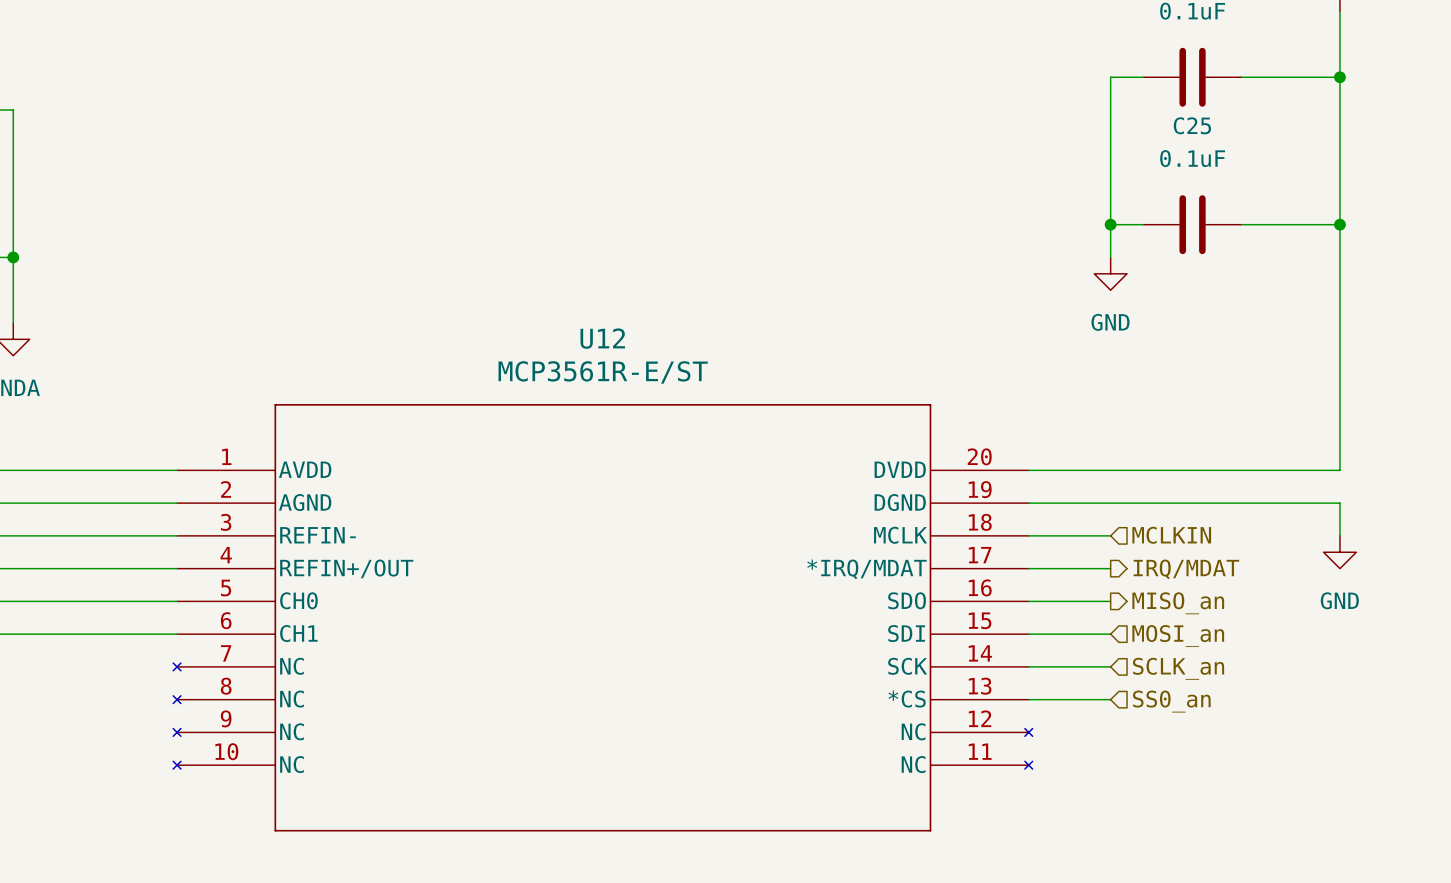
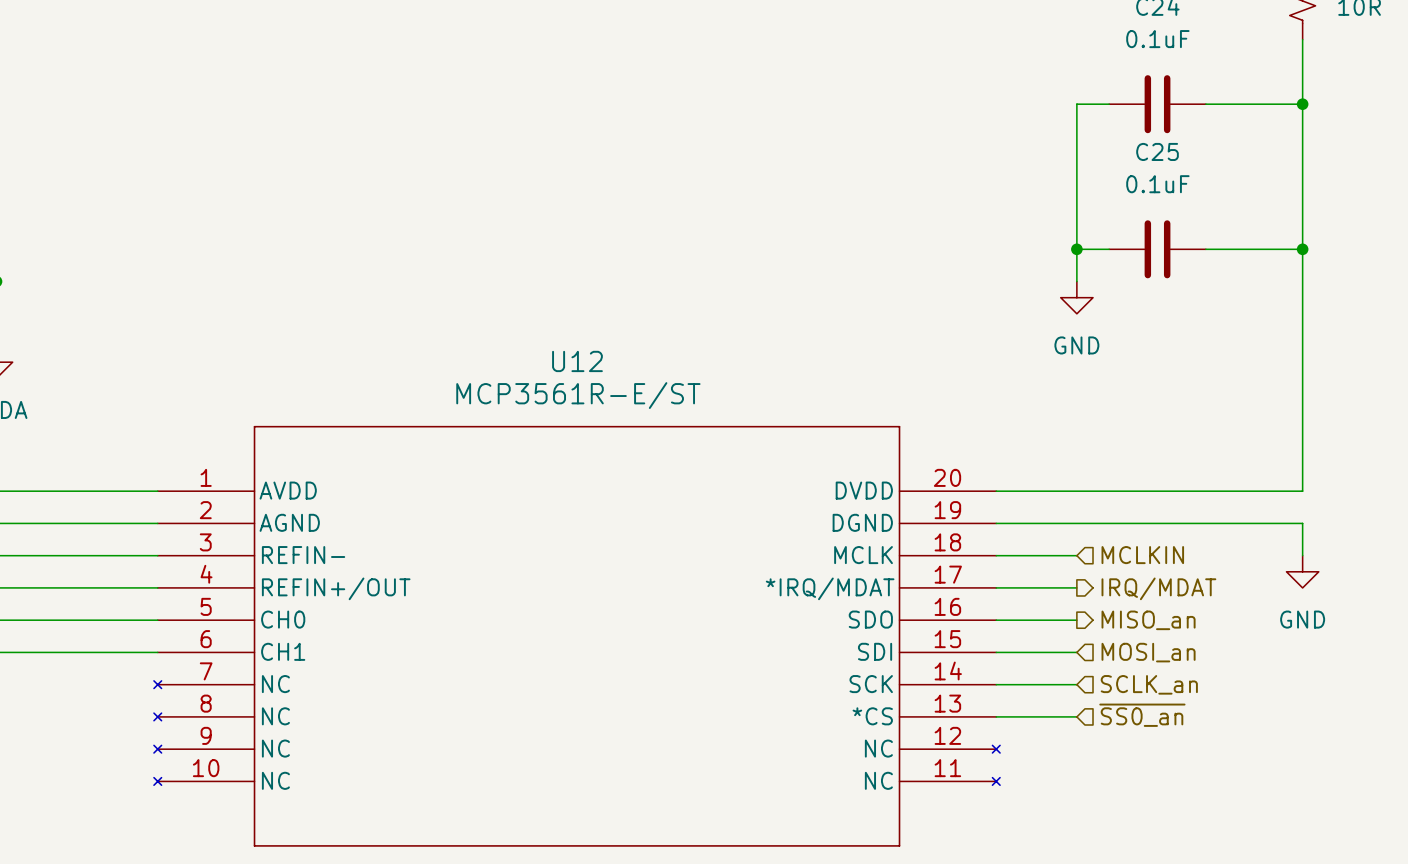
hierarchical label: SS0_an (1171, 701) -> ~{SS0_an} (1142, 715)

